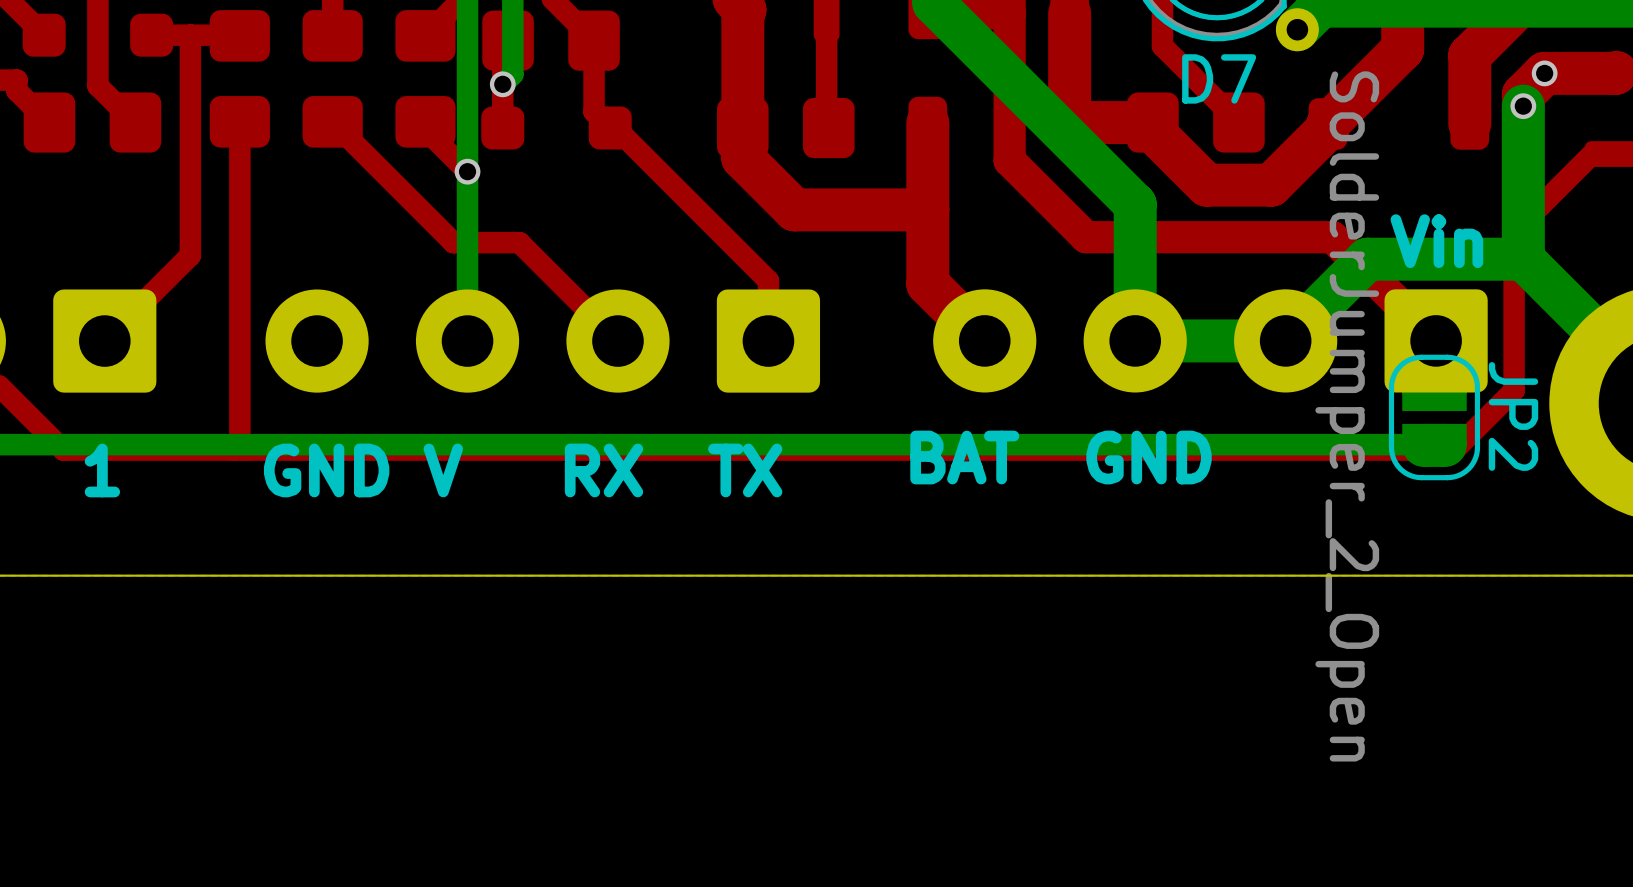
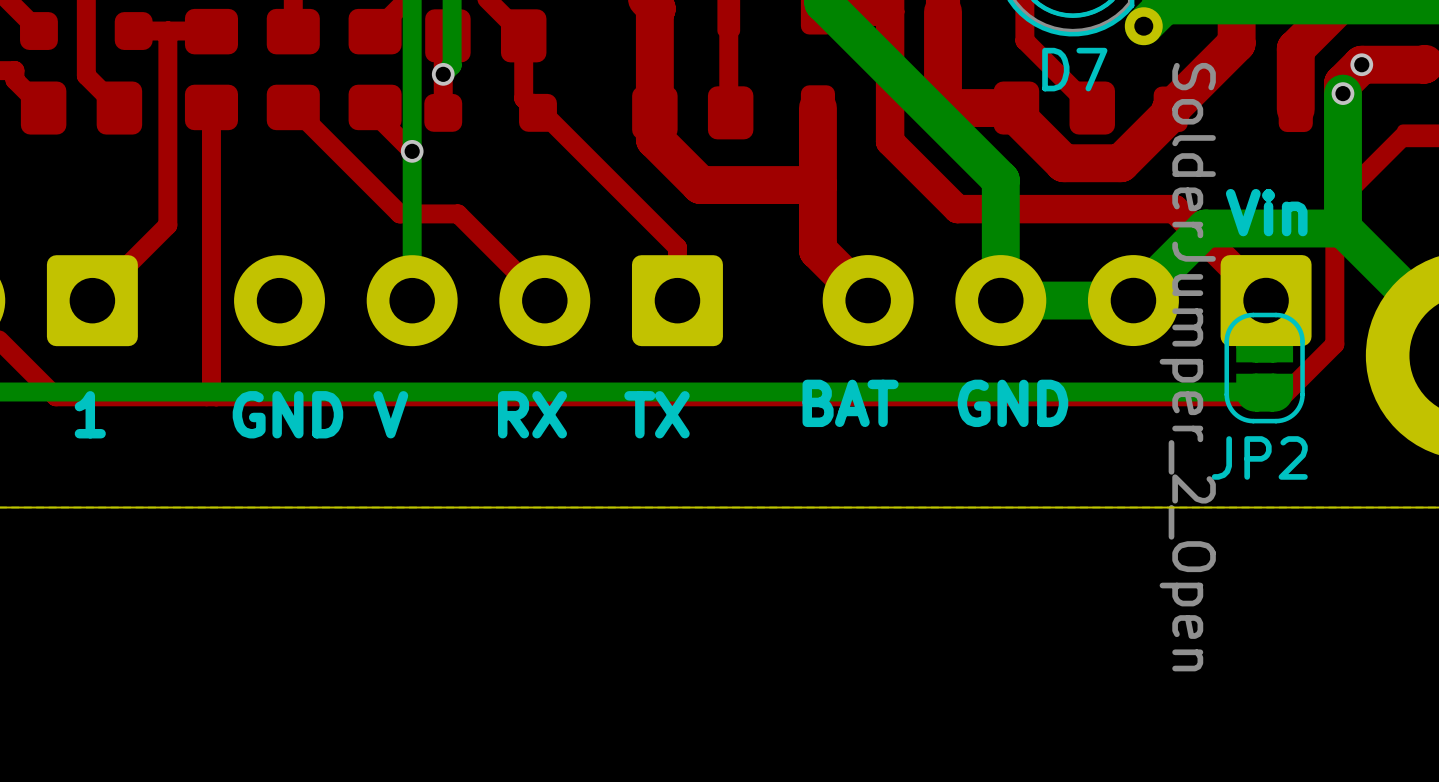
JP2 name rotation: 0° (1513, 416) -> 90° counterclockwise (1259, 457)

